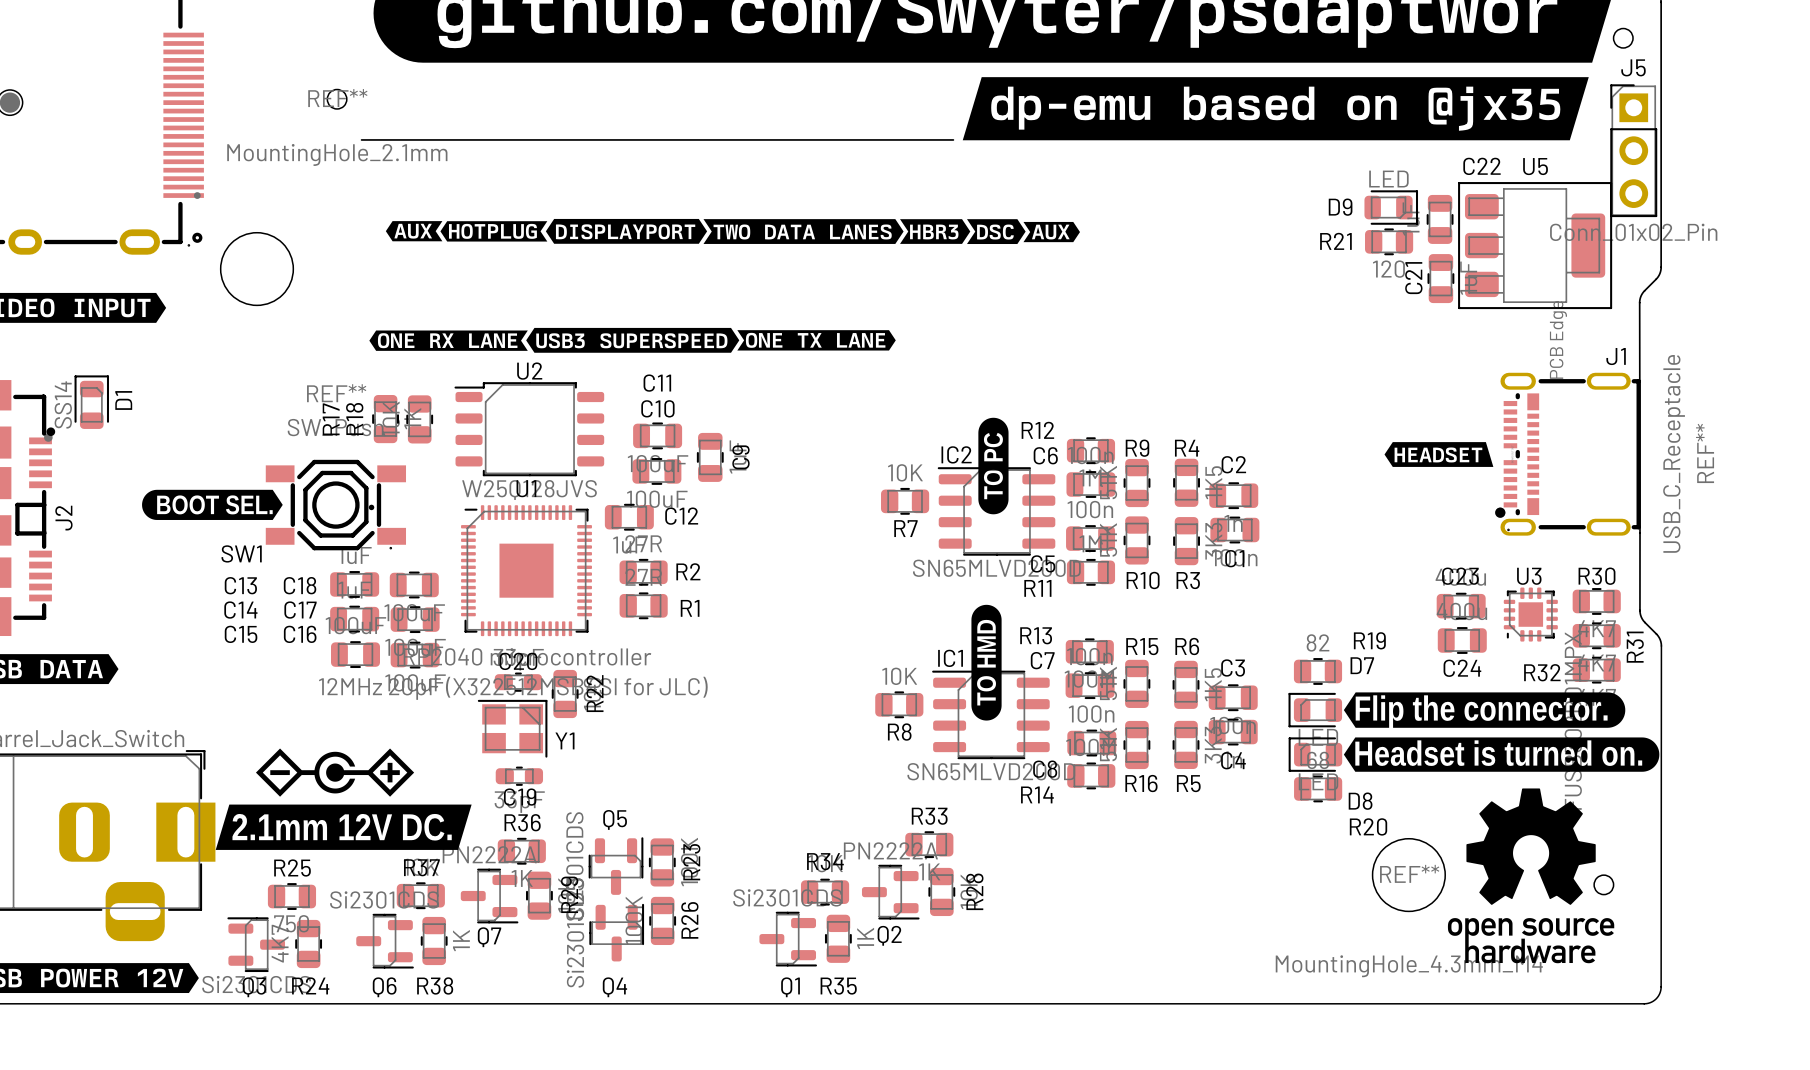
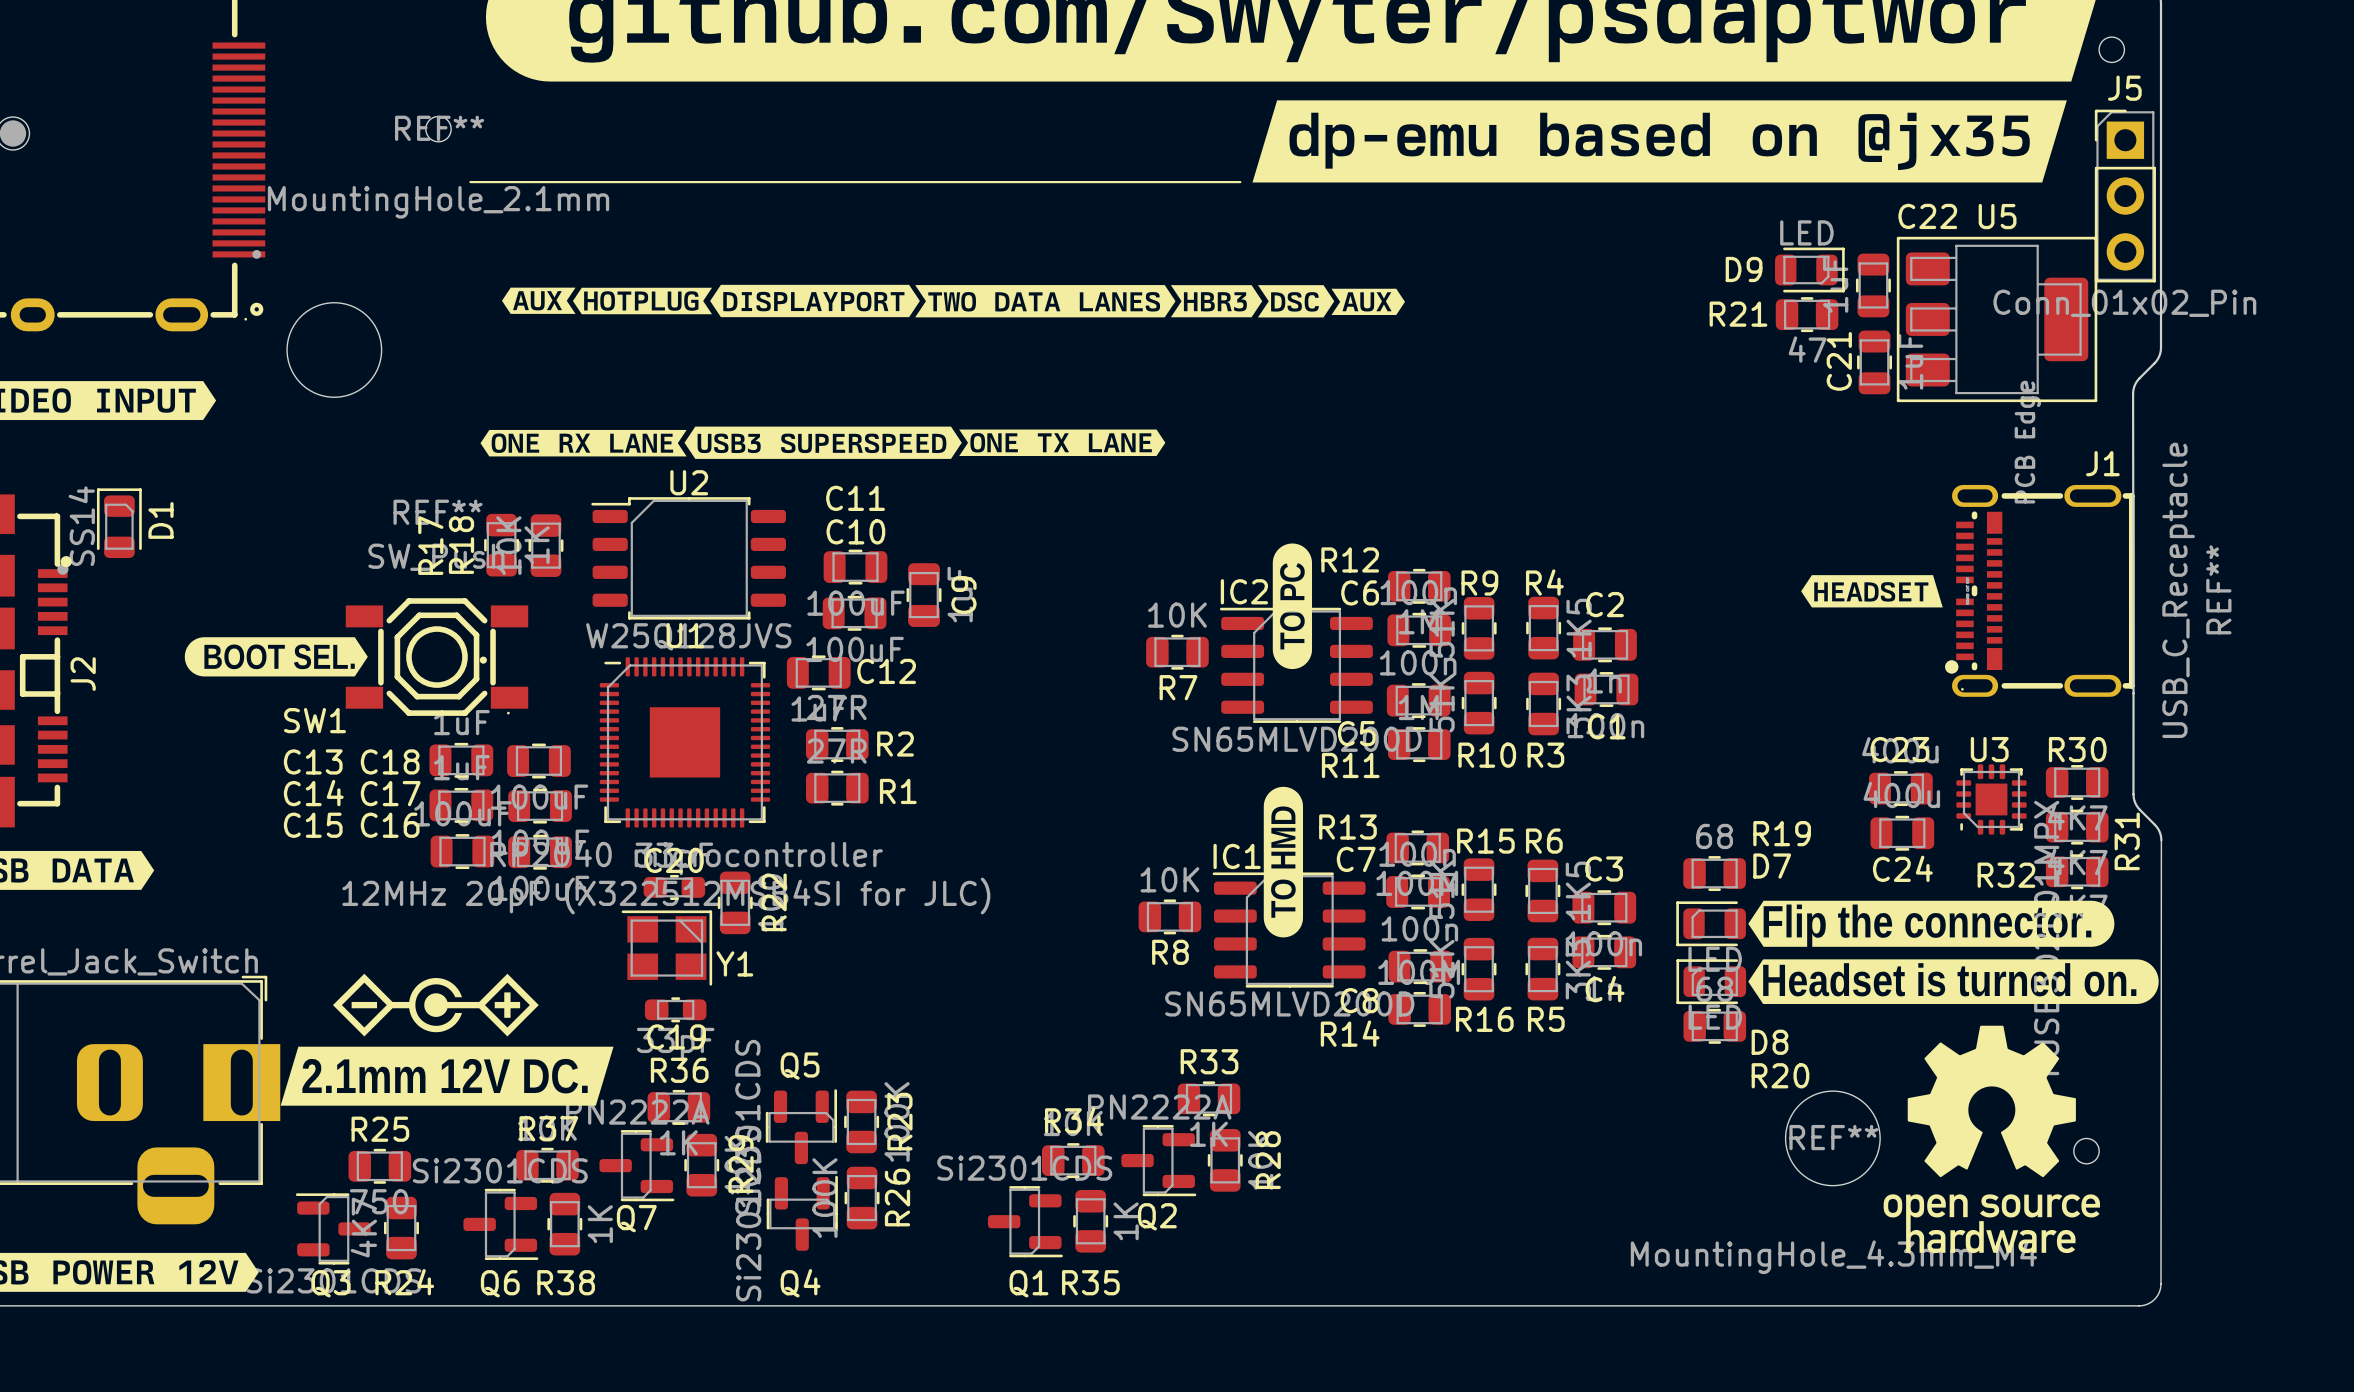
R21 value: 120 (1388, 269) -> 47 (1807, 349)
R19 value: 82 (1318, 642) -> 68 (1714, 836)

